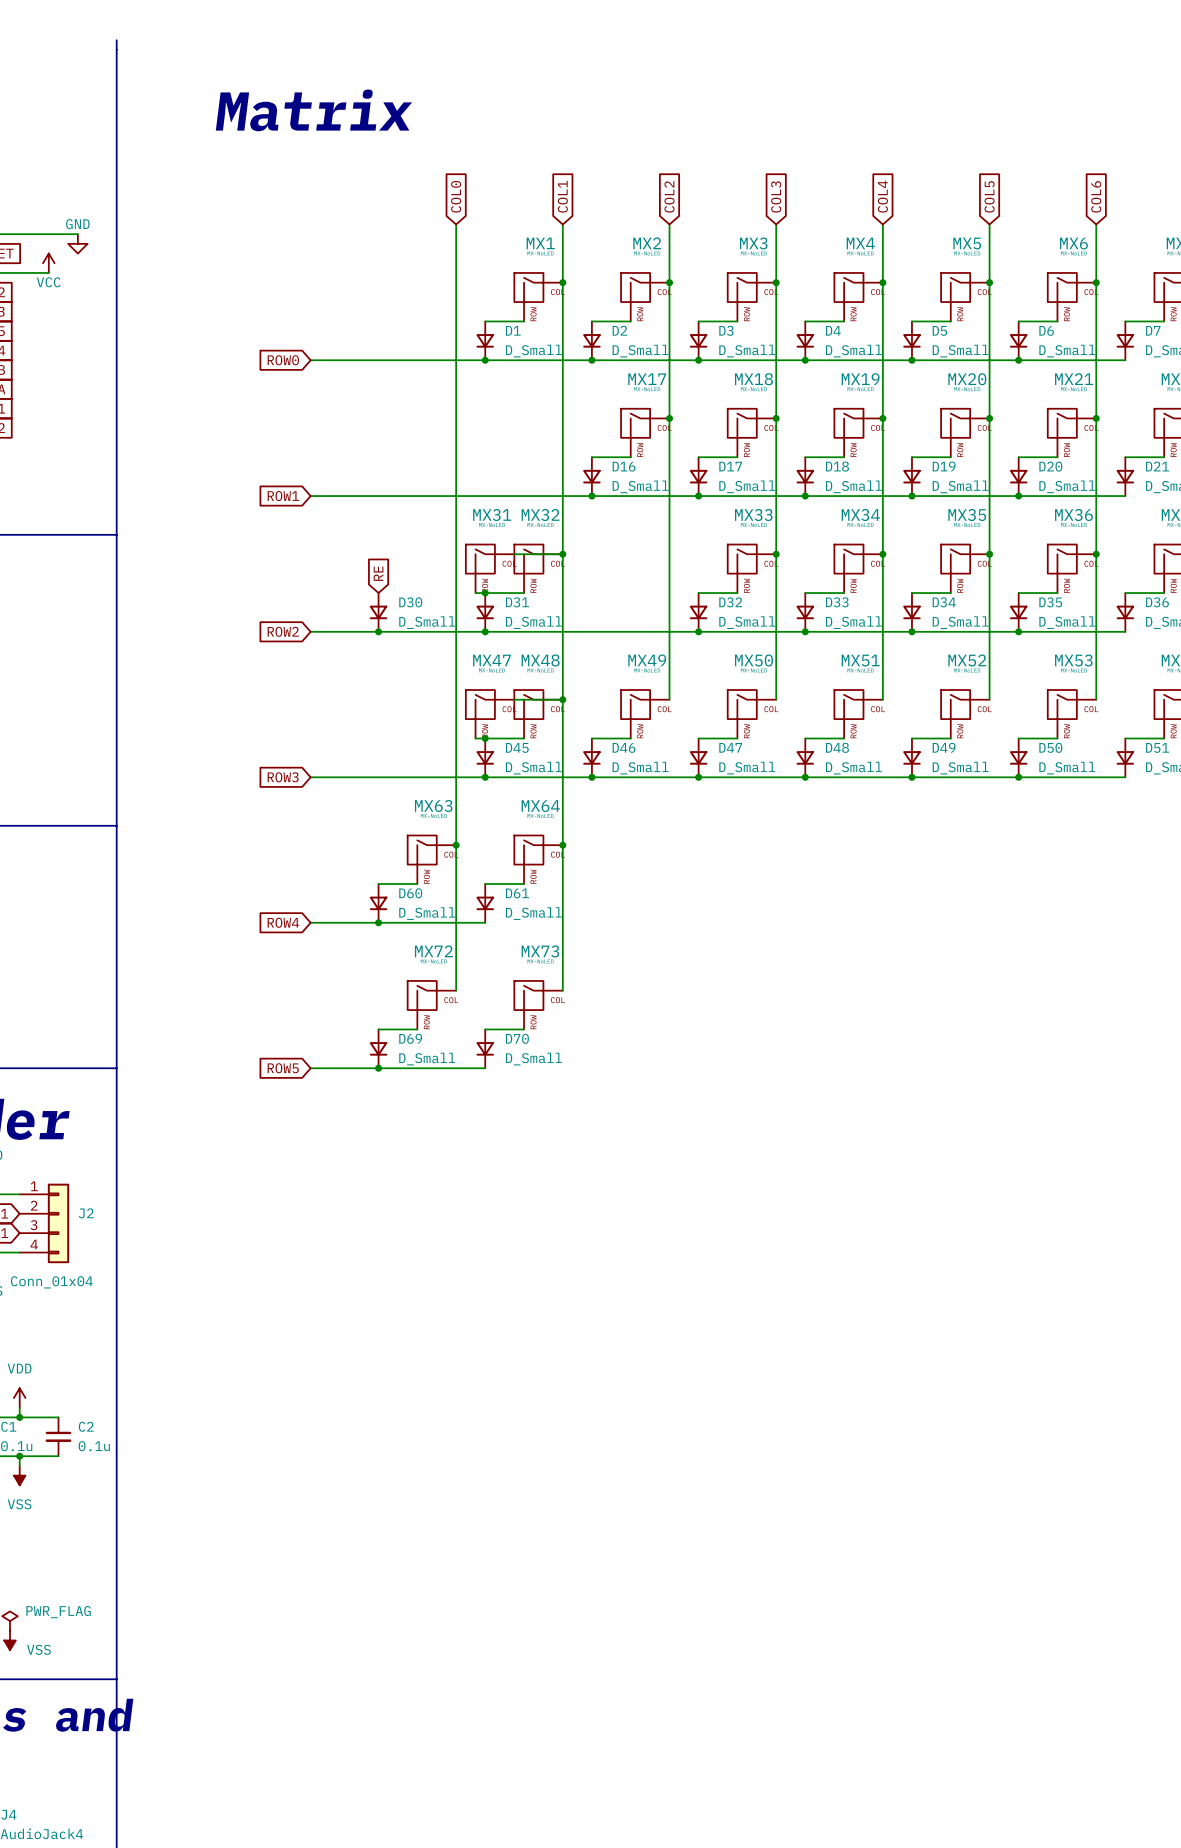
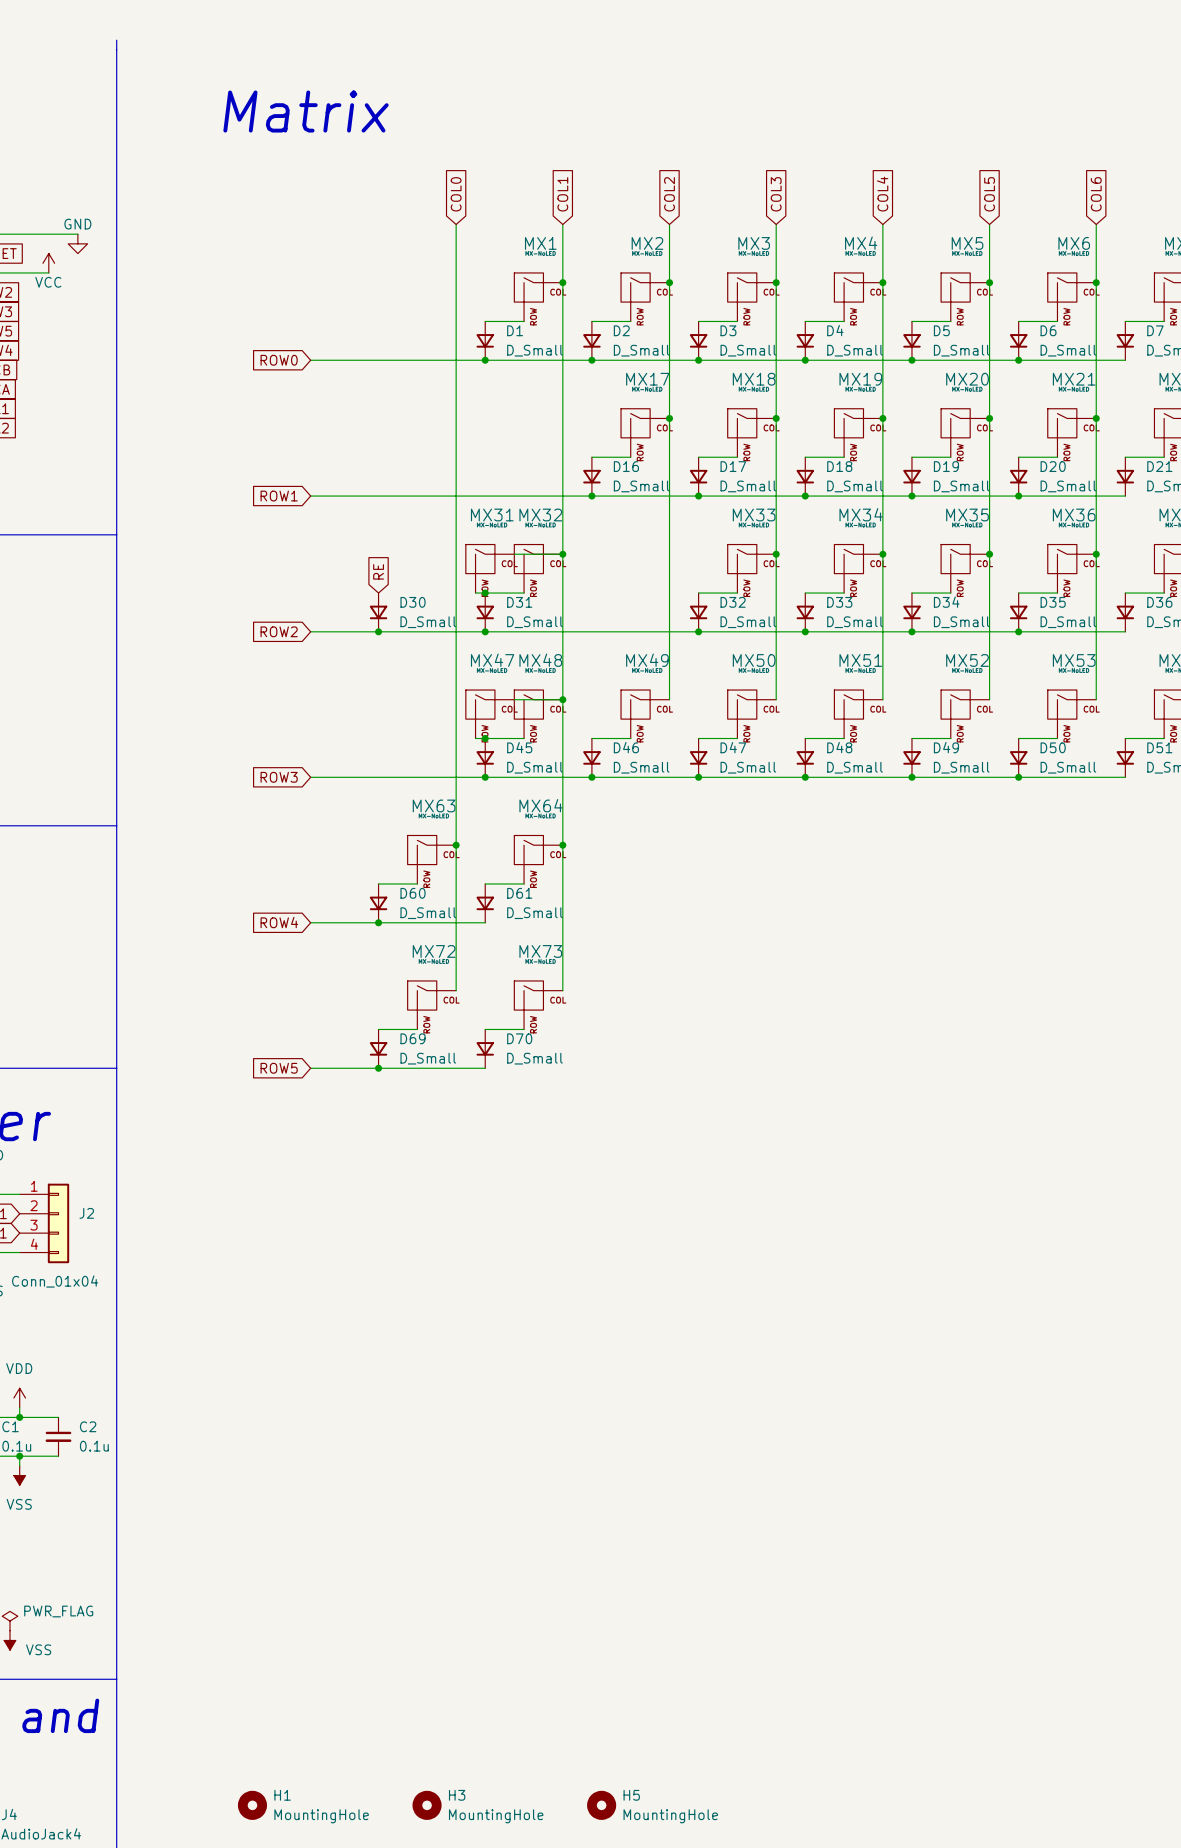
H1: none -> MountingHole (252, 1805)
H3: none -> MountingHole (427, 1805)
H5: none -> MountingHole (601, 1805)

